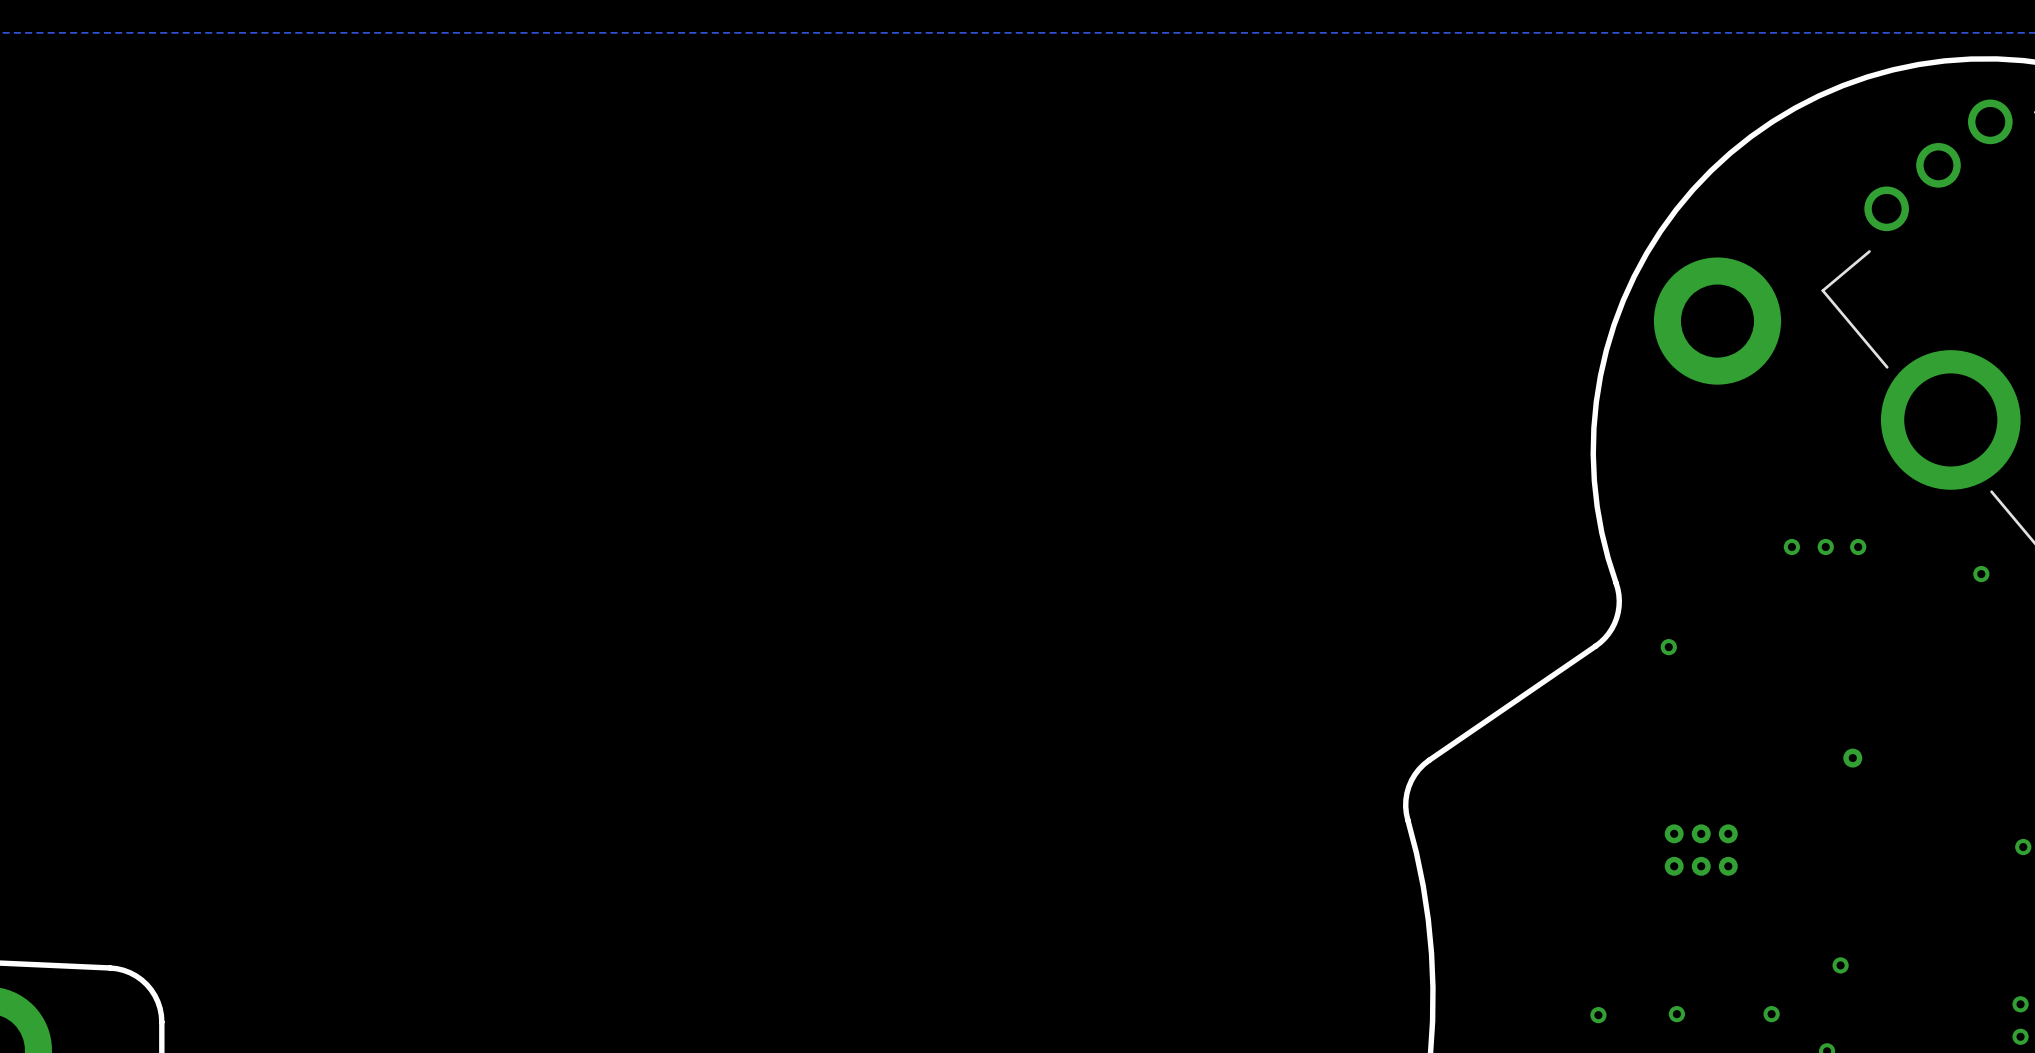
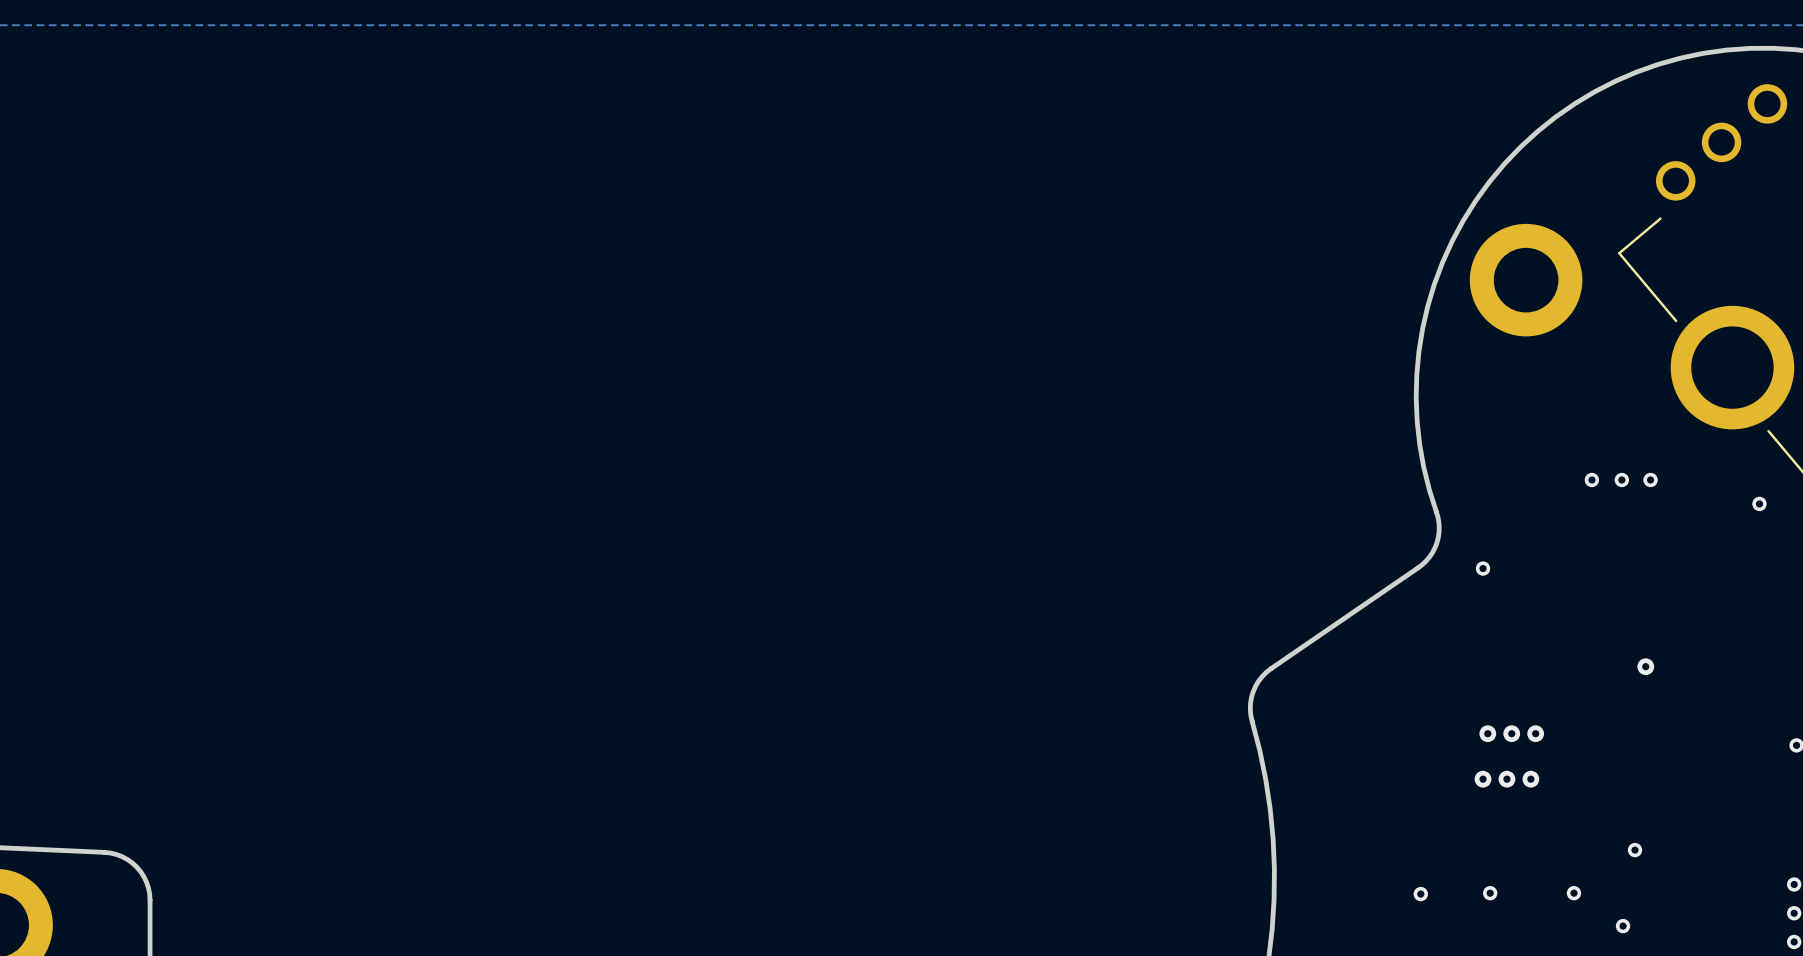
via position: (1674, 866) -> (1483, 779)
via position: (1701, 866) -> (1506, 779)
via position: (1728, 866) -> (1530, 779)

